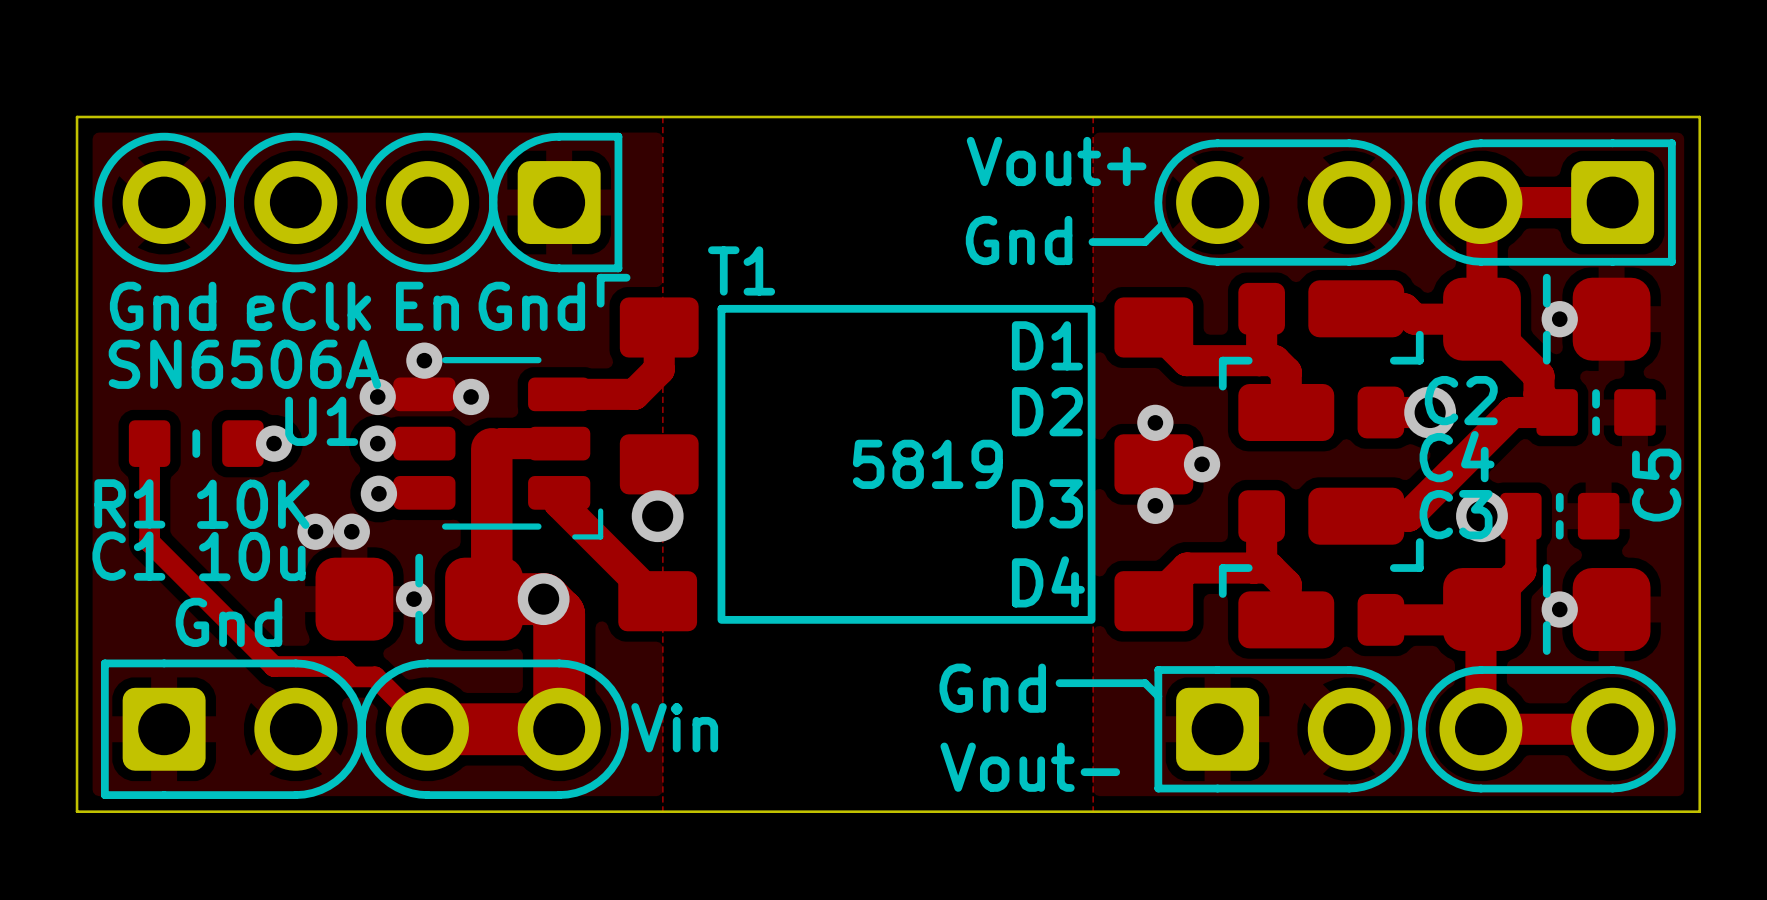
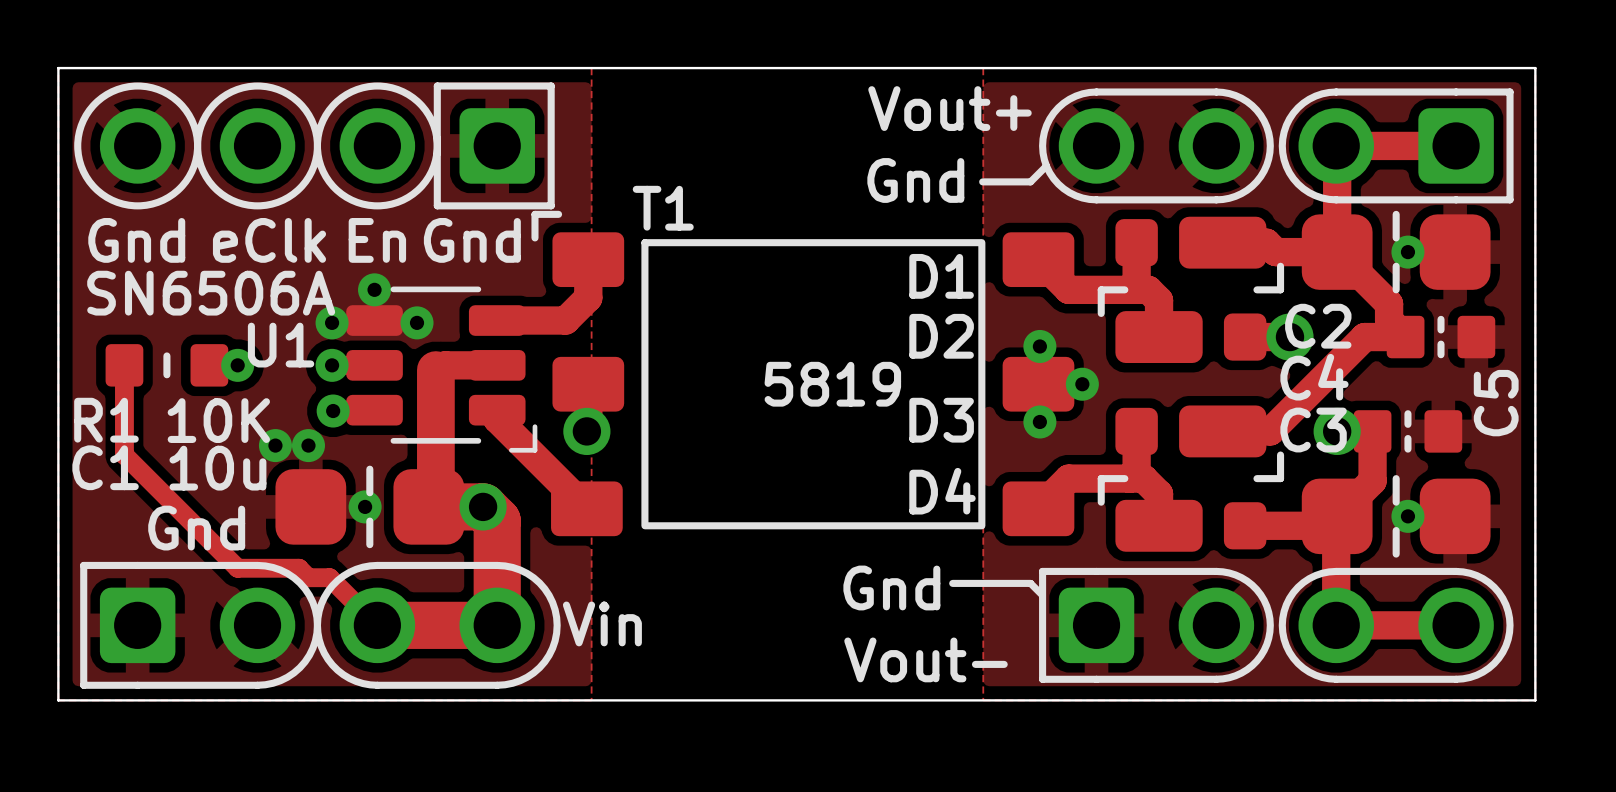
line: (559, 136) (535, 140) (515, 153) (504, 165) (497, 179) (493, 202) (497, 225) (504, 239) (515, 251) (535, 264) (559, 268) -> (497, 86) (437, 86) (437, 205) (497, 205)

